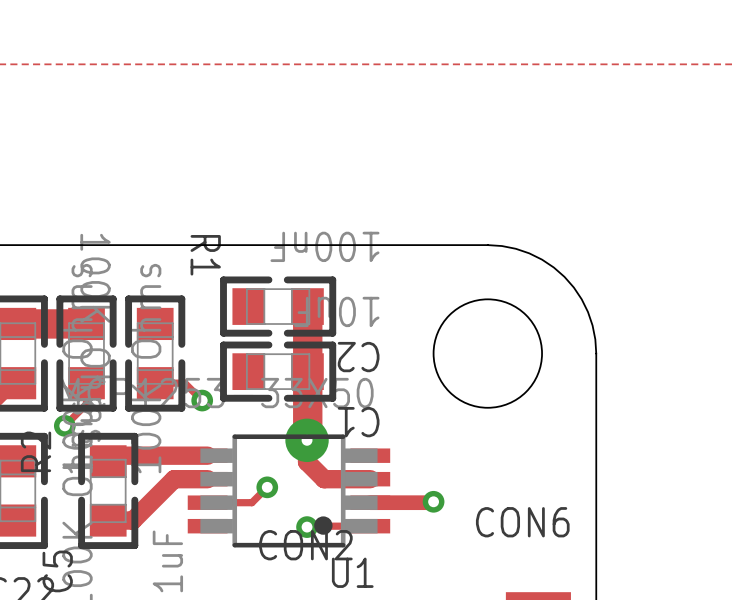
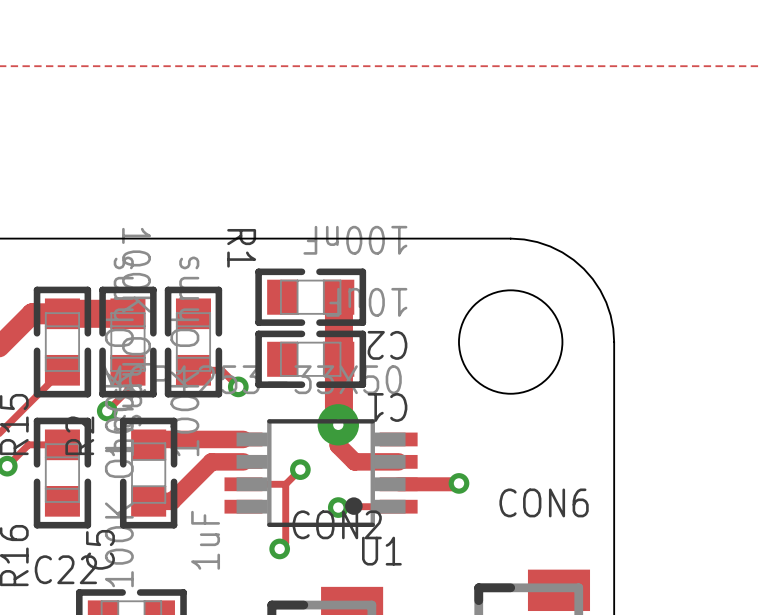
track: none -> (285, 484) (285, 542) (279, 548)
via: none -> (279, 548)

